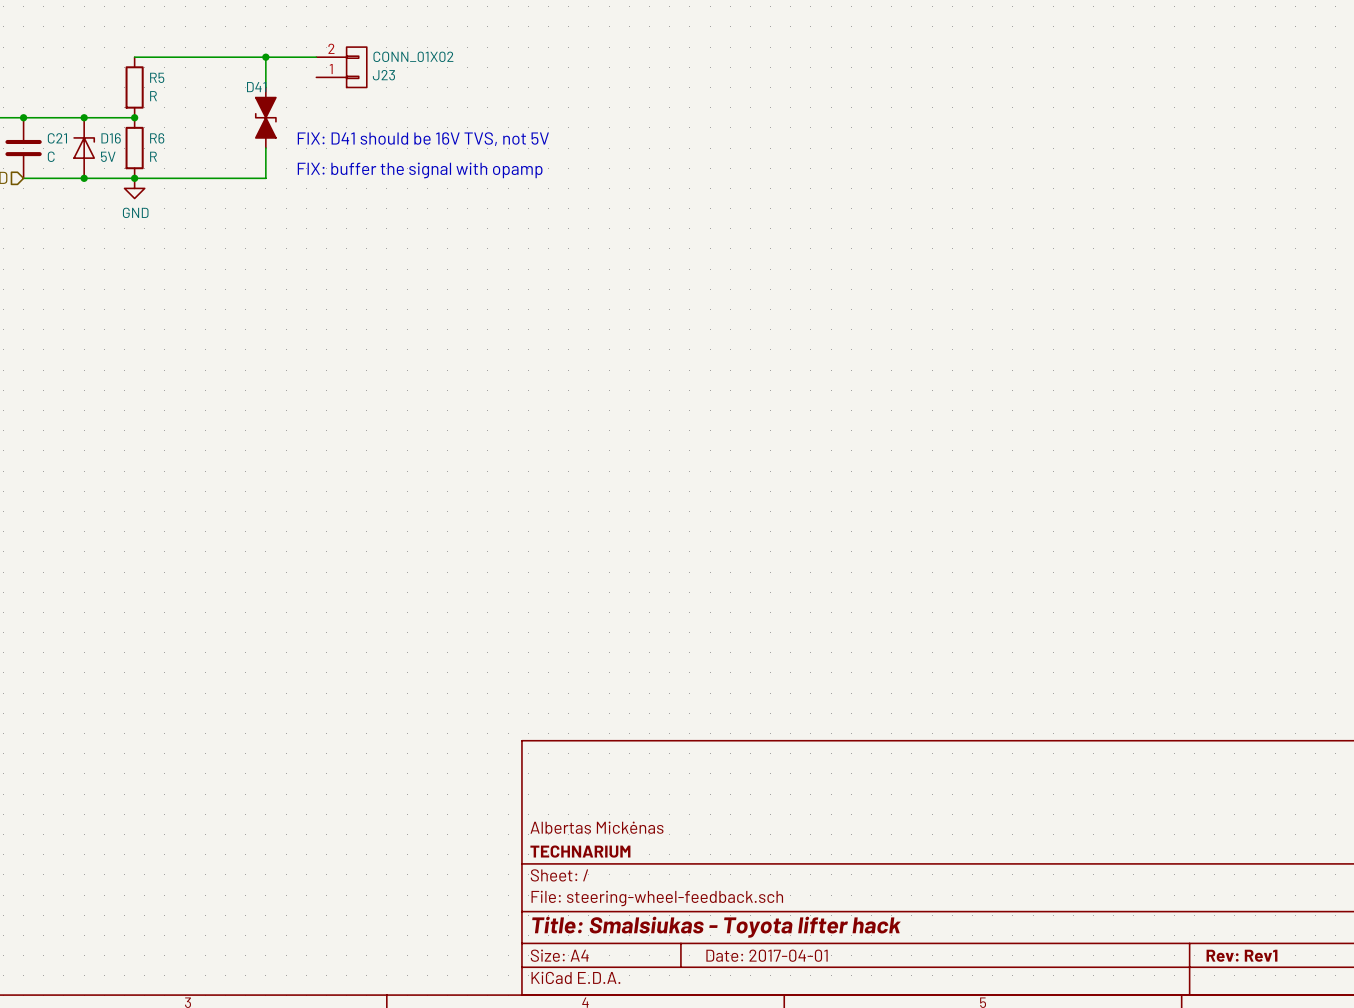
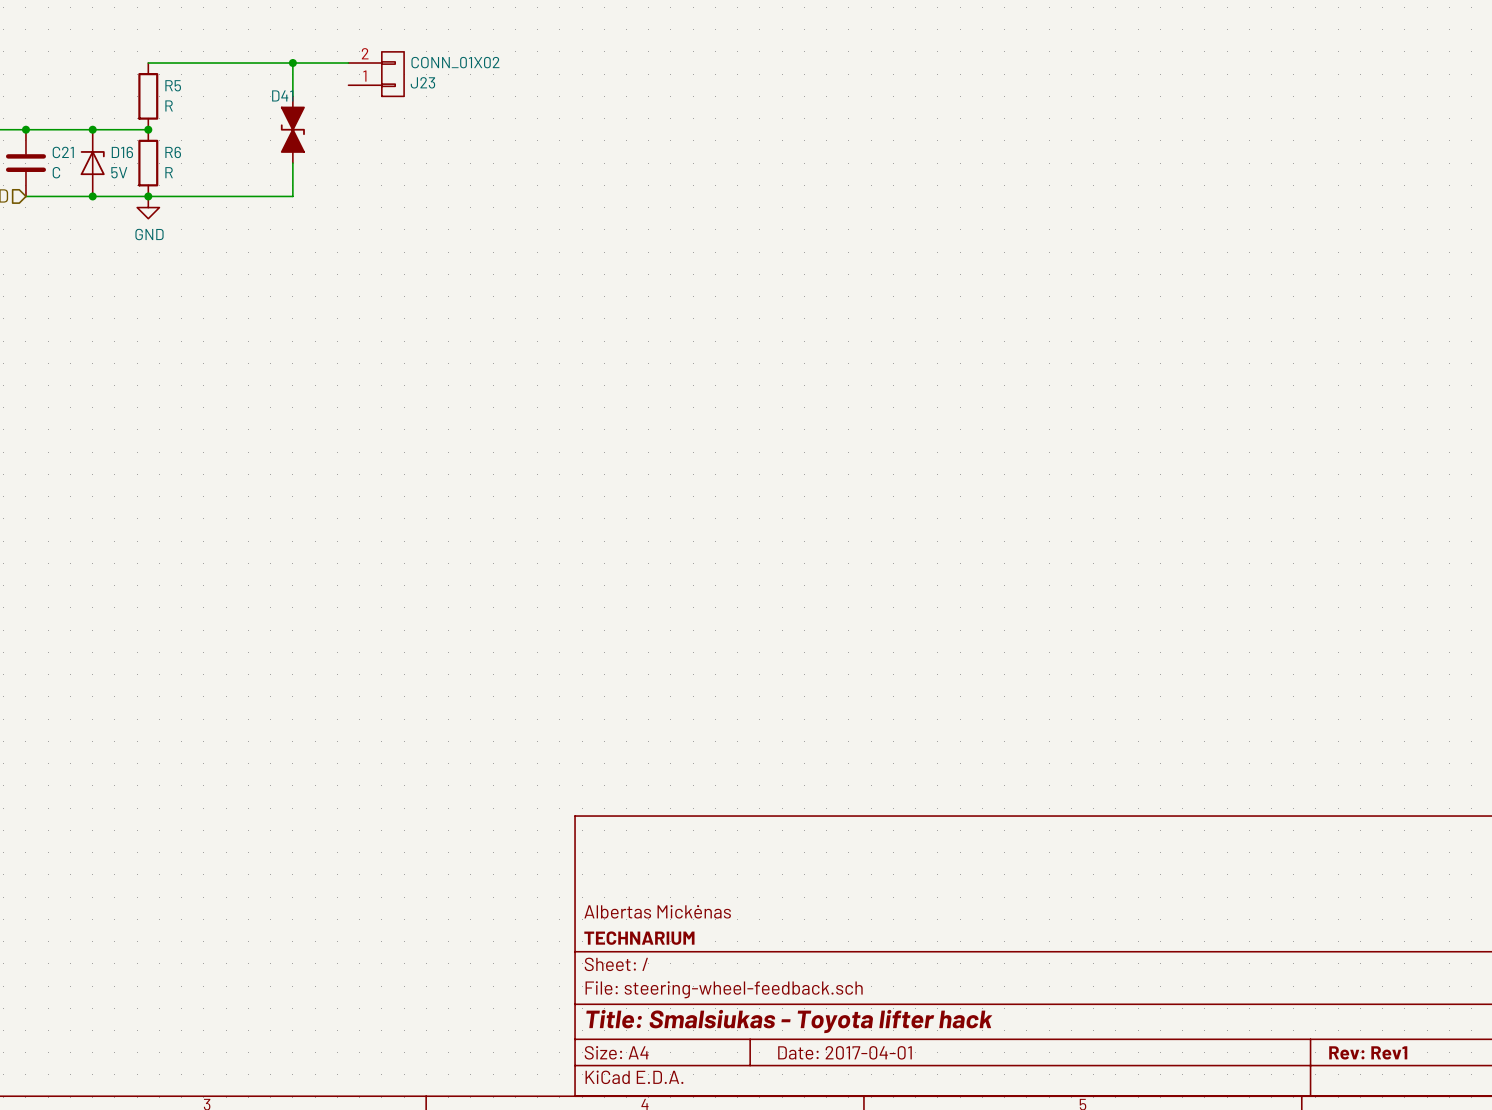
text: FIX: D41 should be 16V TVS, not 5V (423, 139) -> none
text: FIX: buffer the signal with opamp (420, 170) -> none

